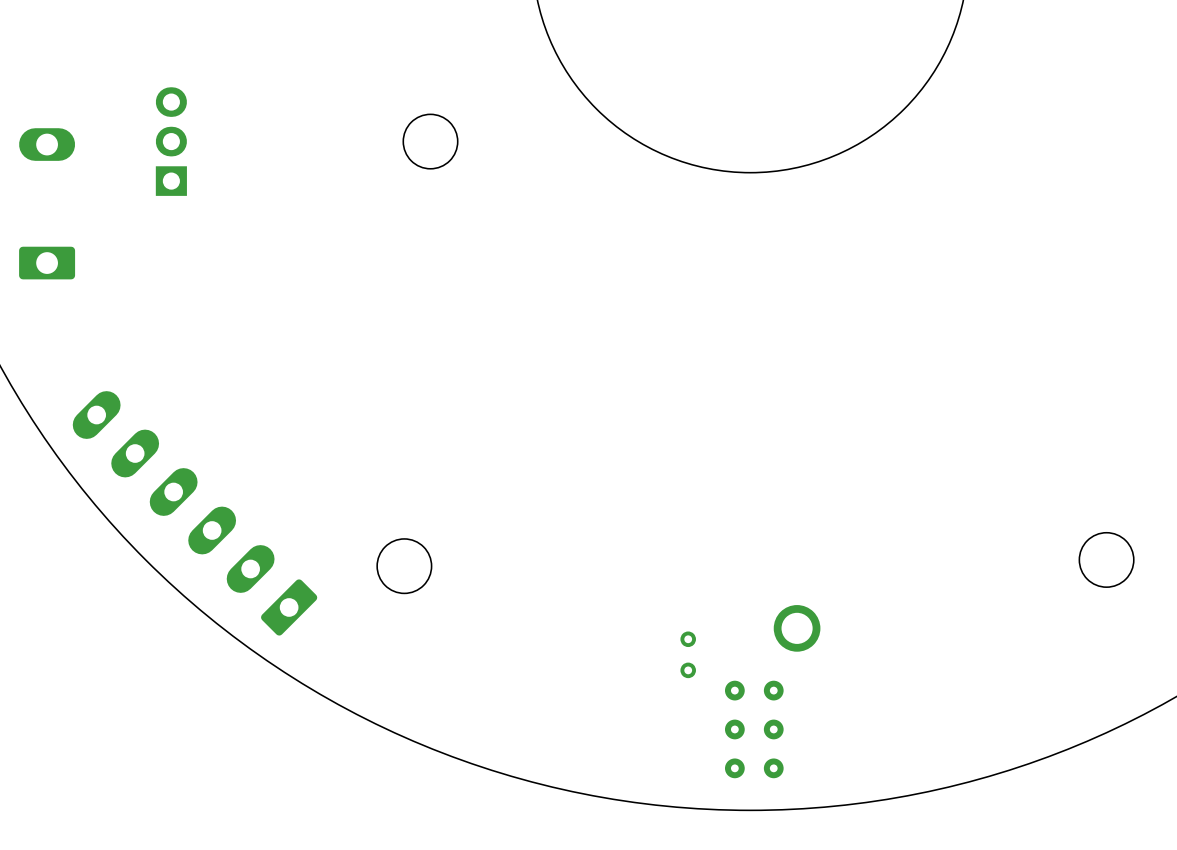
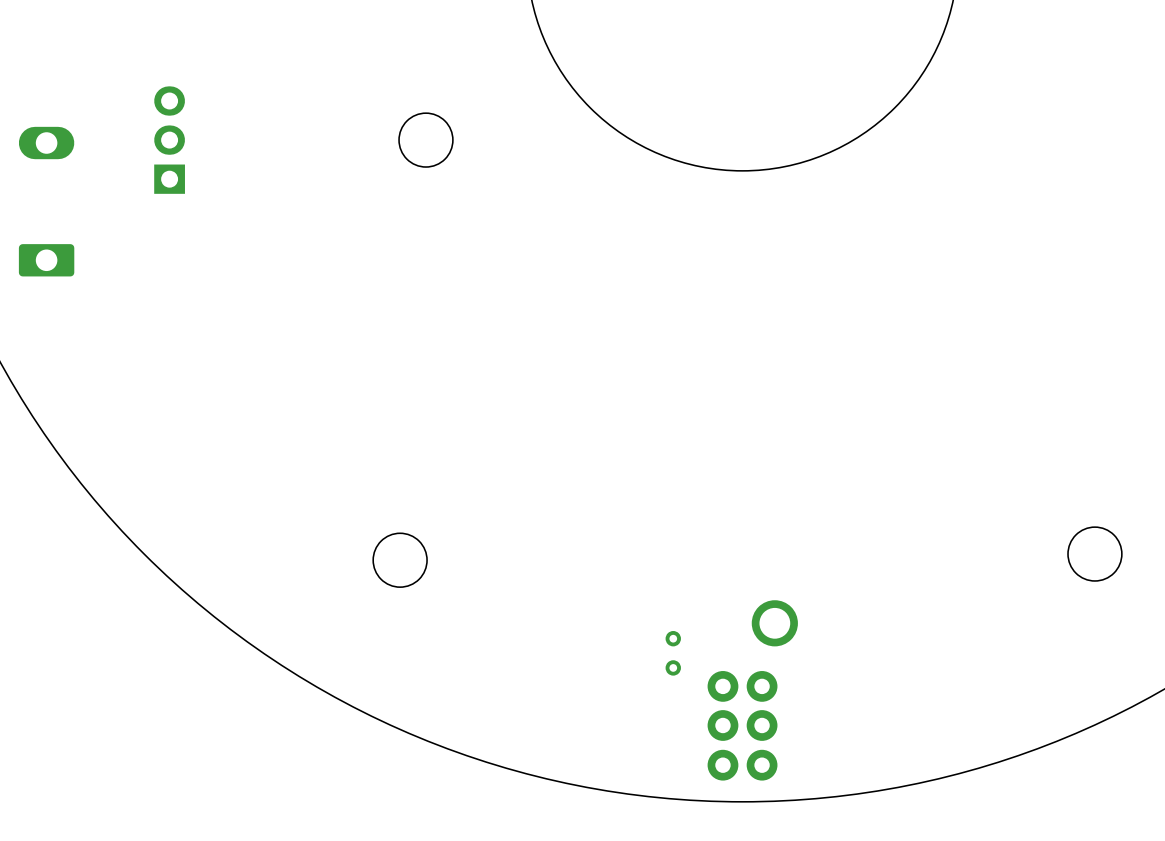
part: (195, 513) -> none
part footprint: [680, 605, 821, 779] -> [665, 600, 798, 781]

